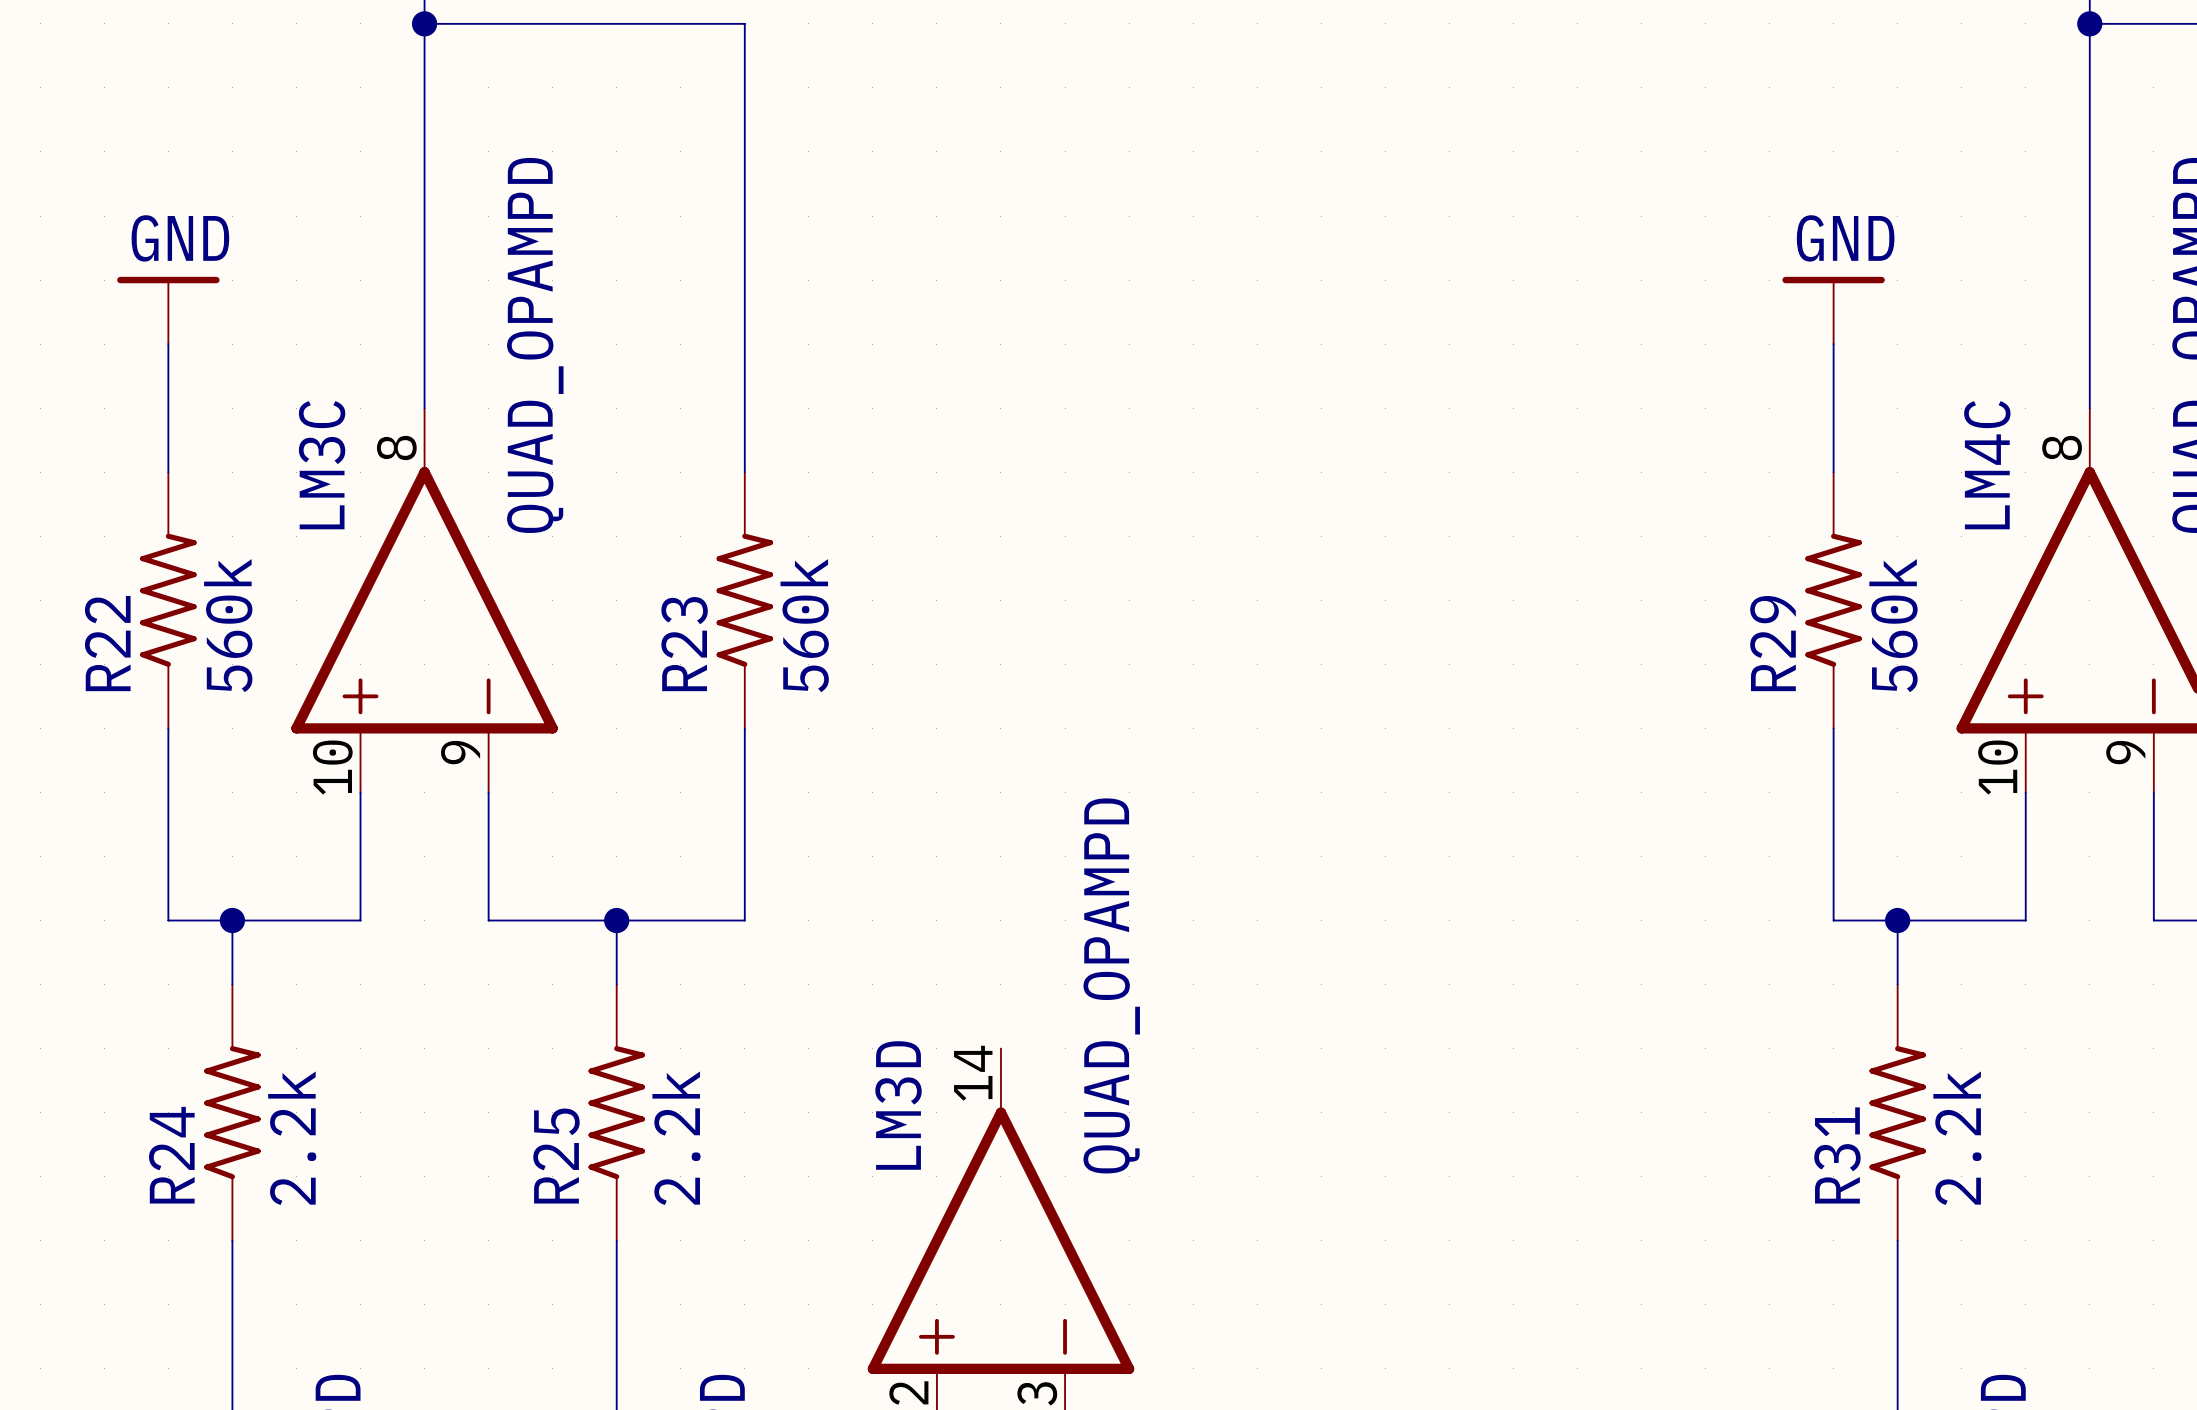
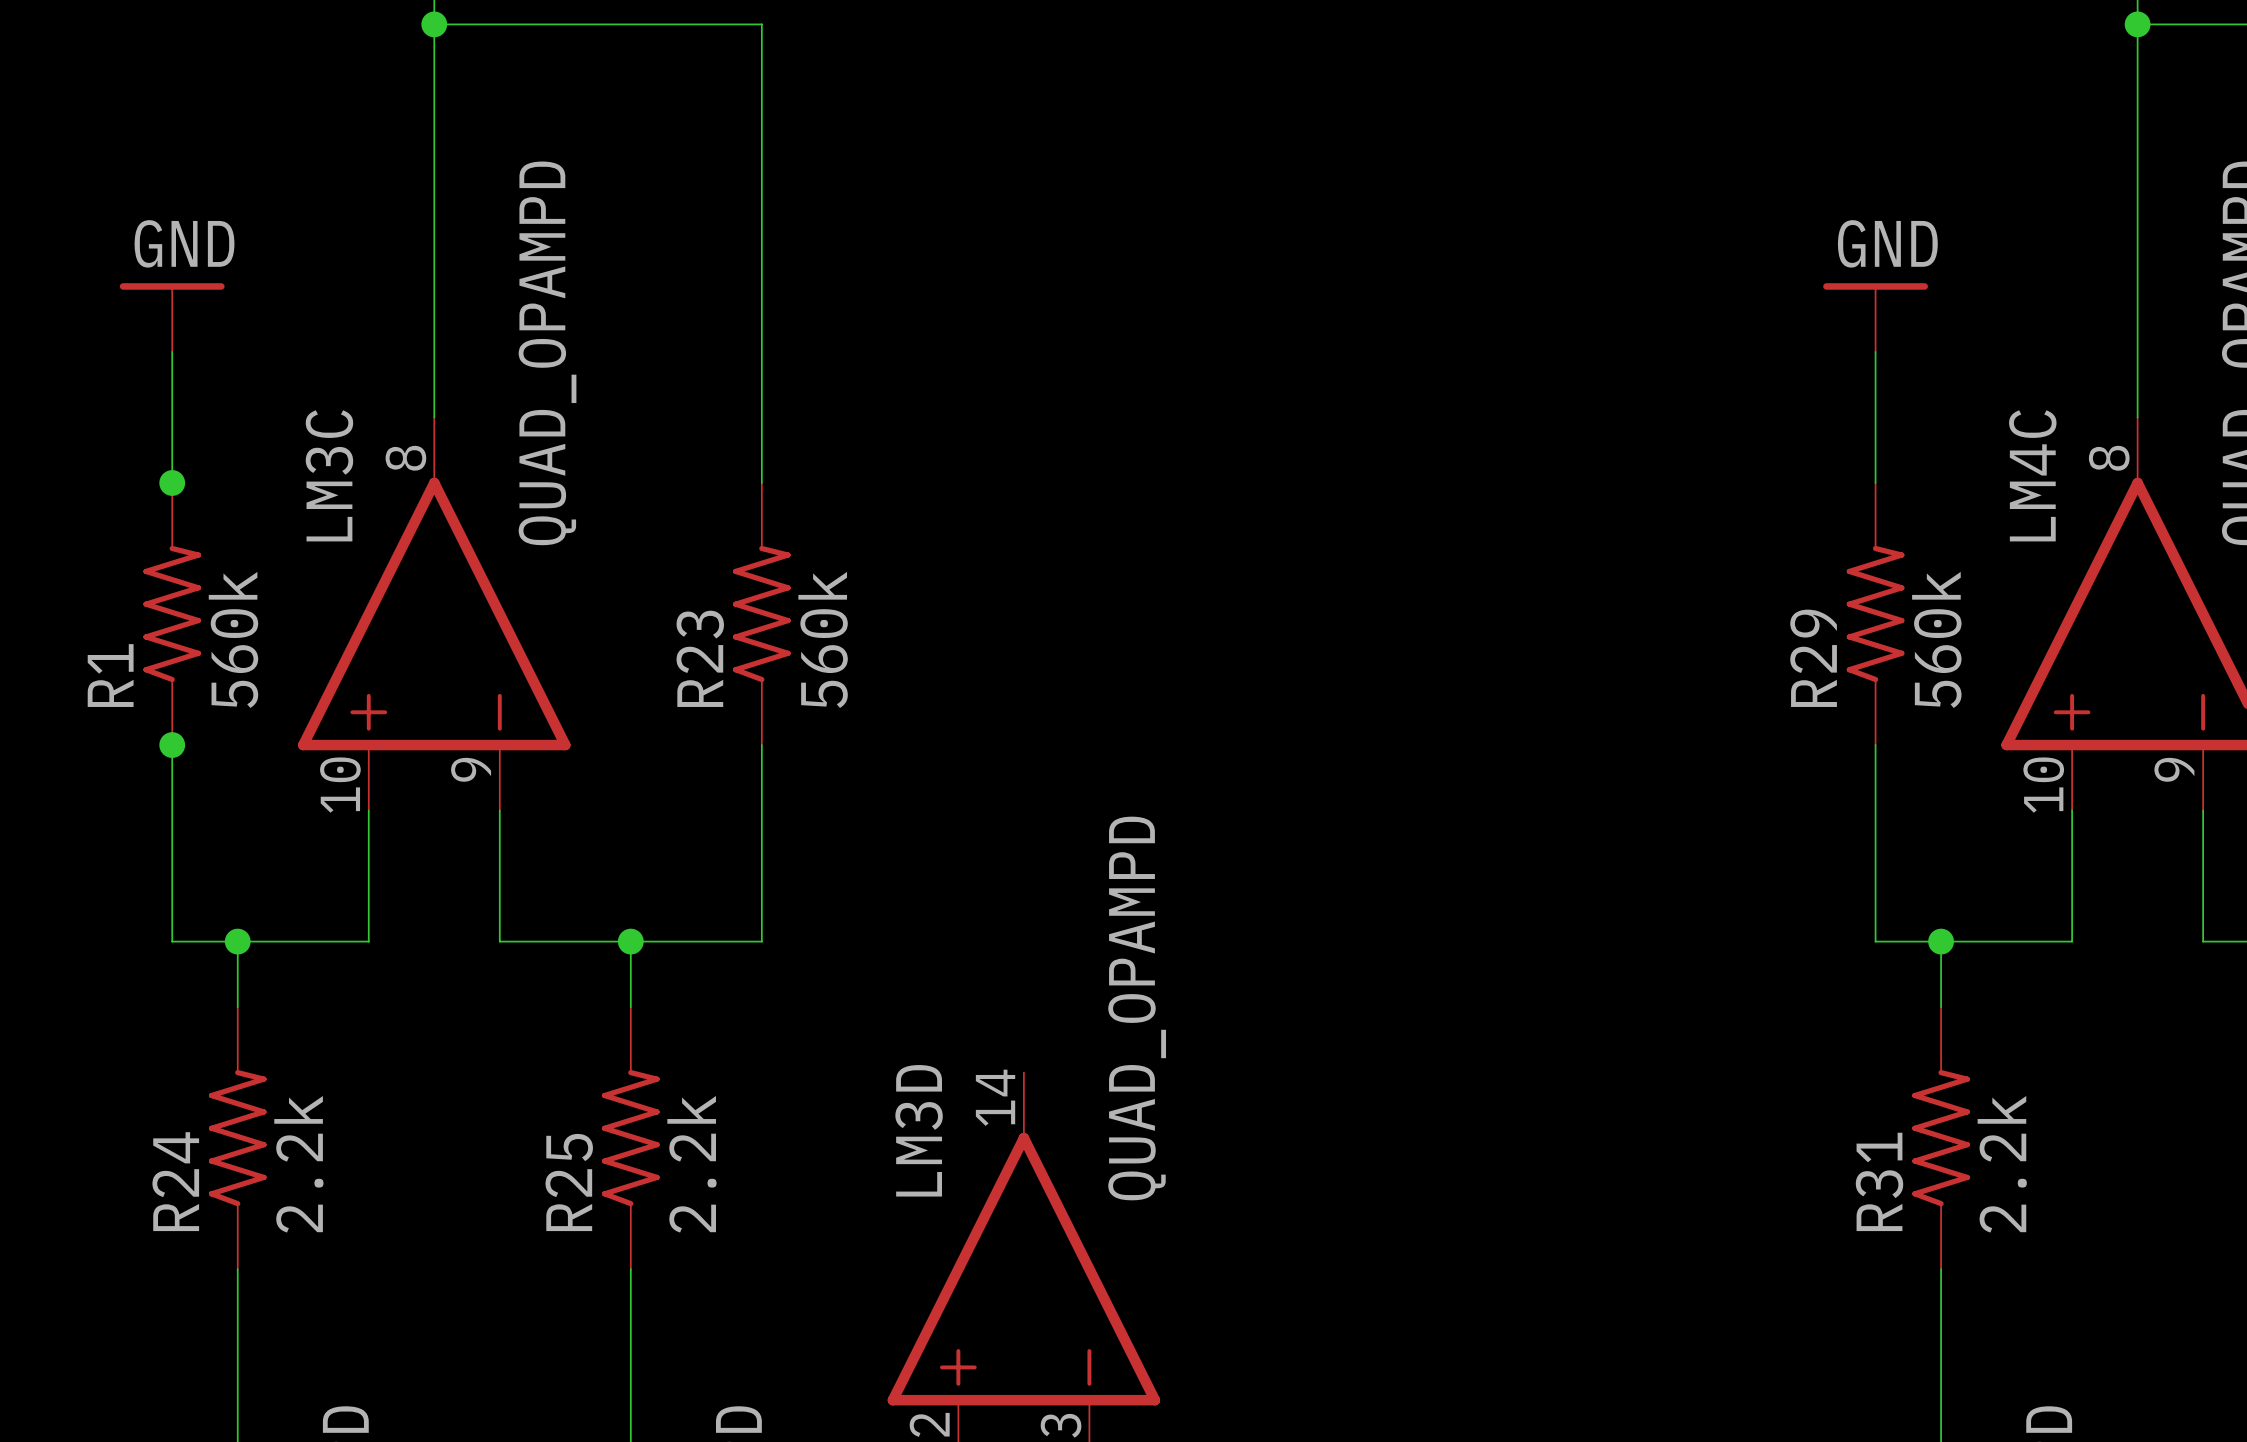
junction: none -> (172, 482)
R22 name: R22 (107, 643) -> R1 (110, 675)
junction: none -> (172, 745)

